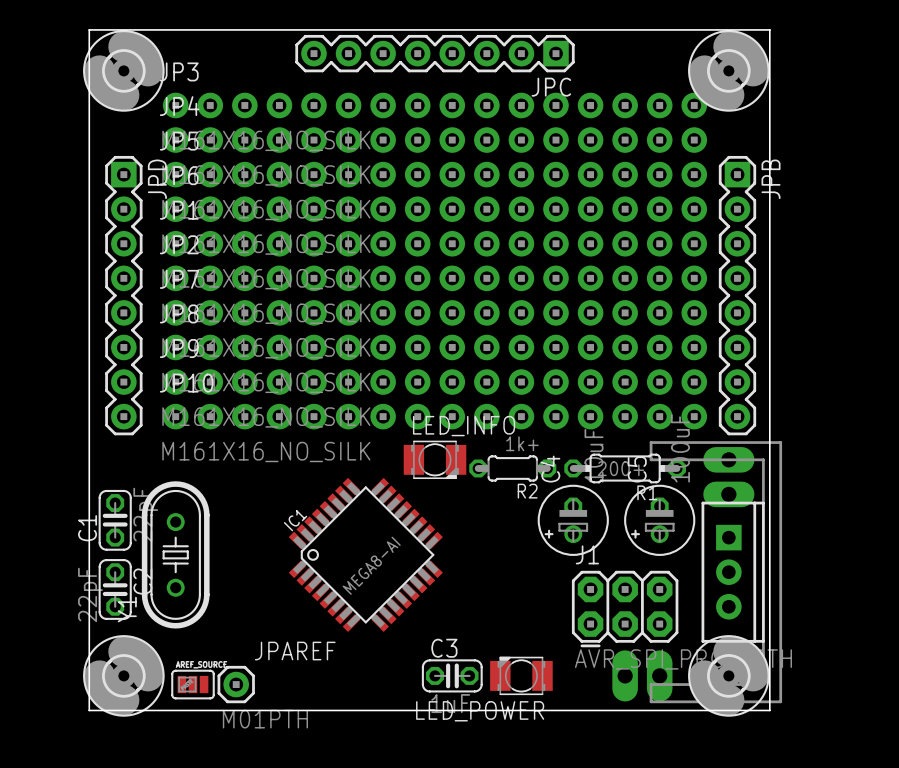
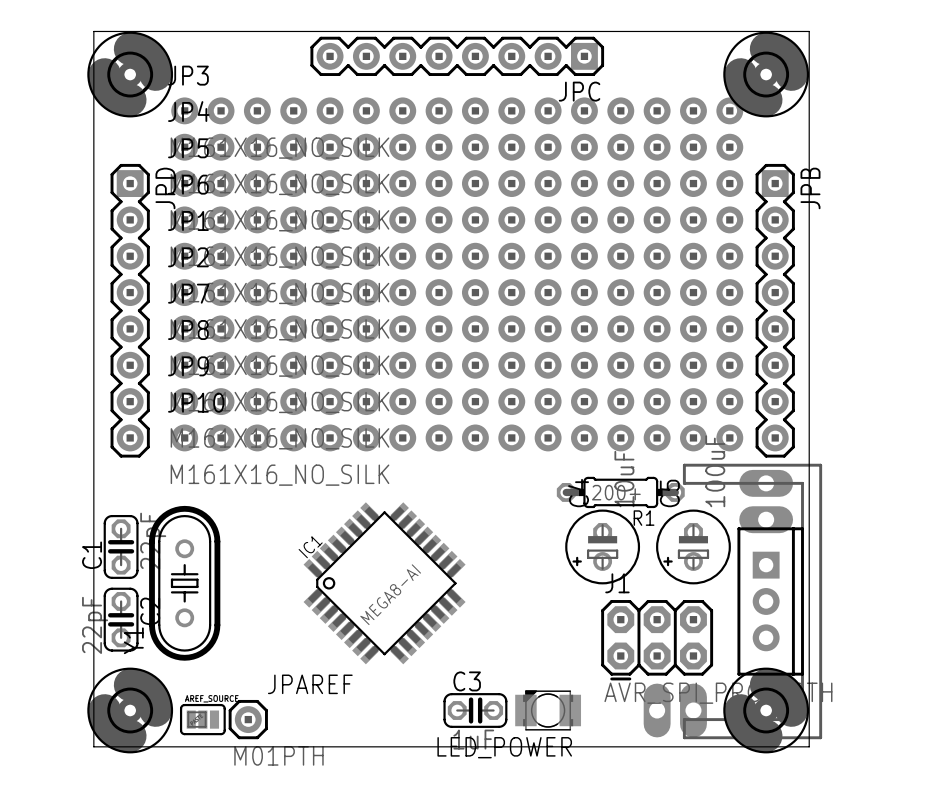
LED_INFO: (434, 459) -> none
R2: 1k+ (512, 468) -> none
R1 position: (625, 468) -> (620, 492)

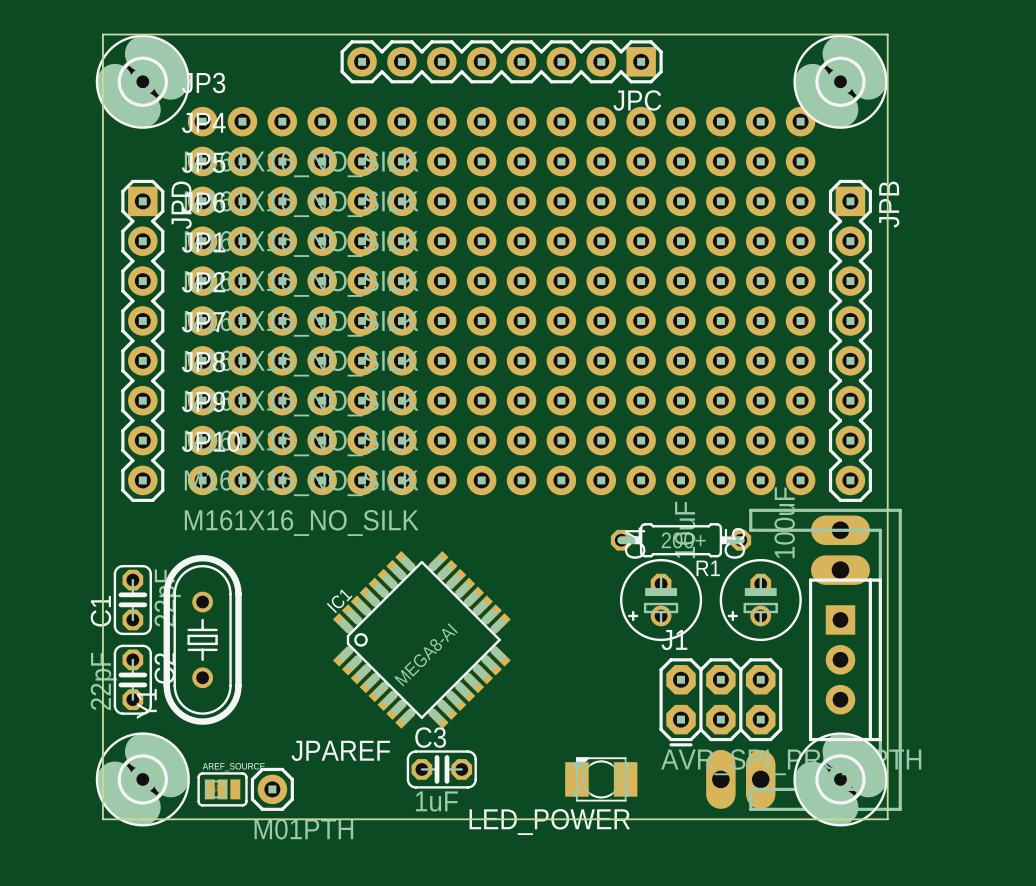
C3 position: (475, 710) -> (441, 769)

